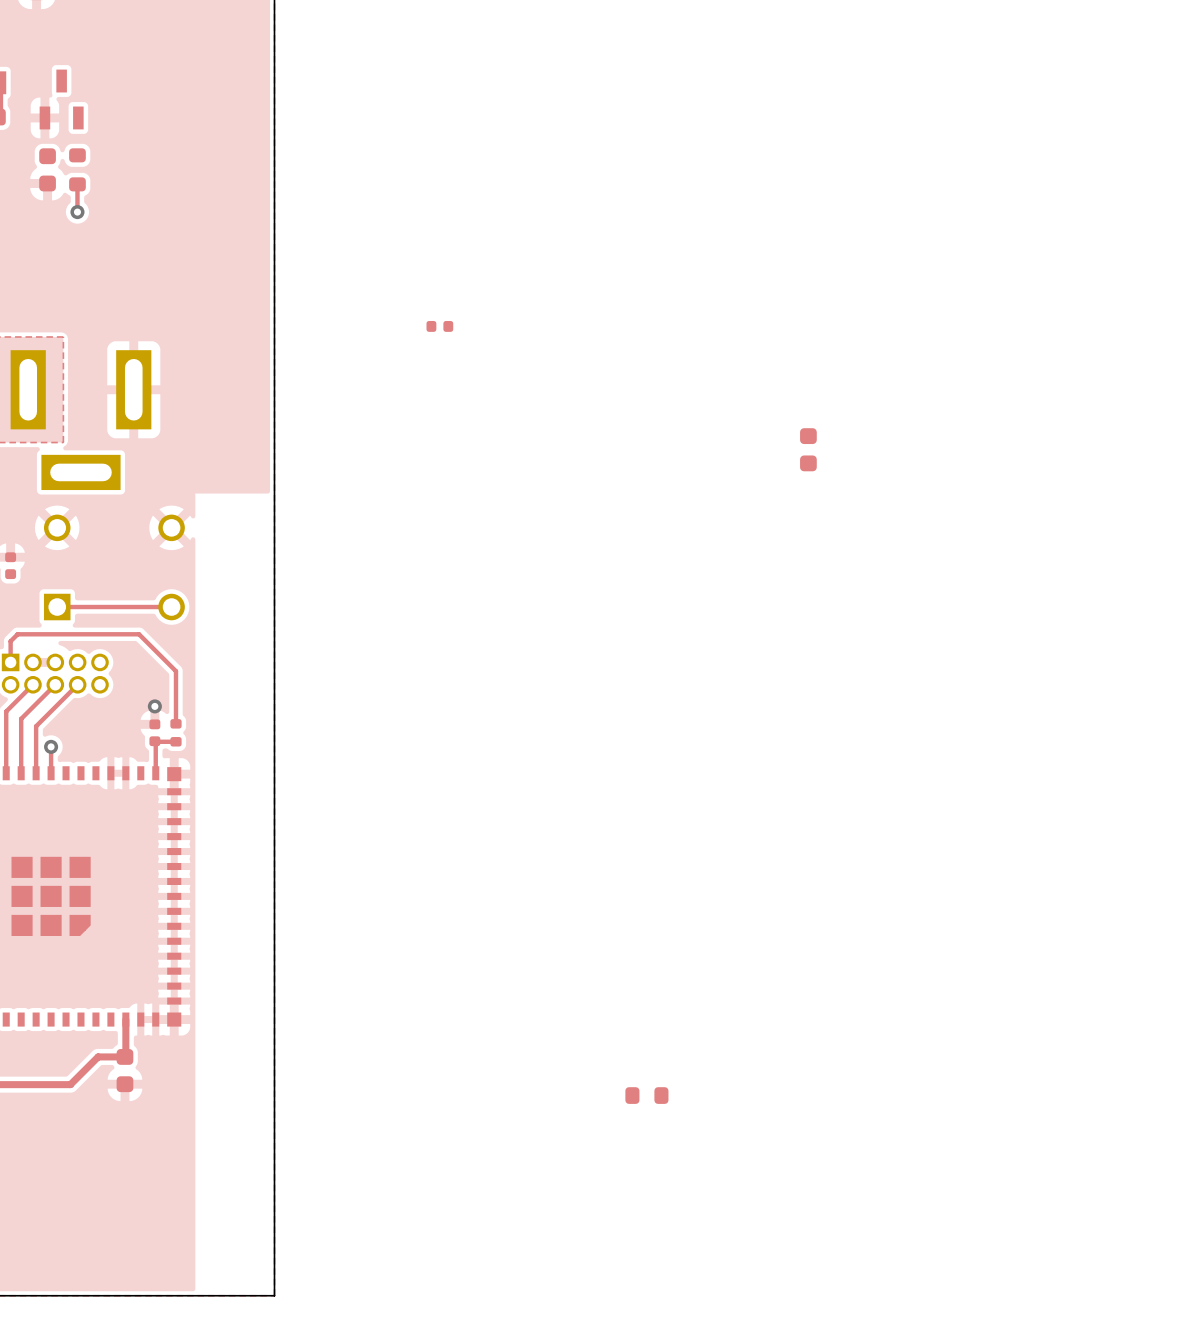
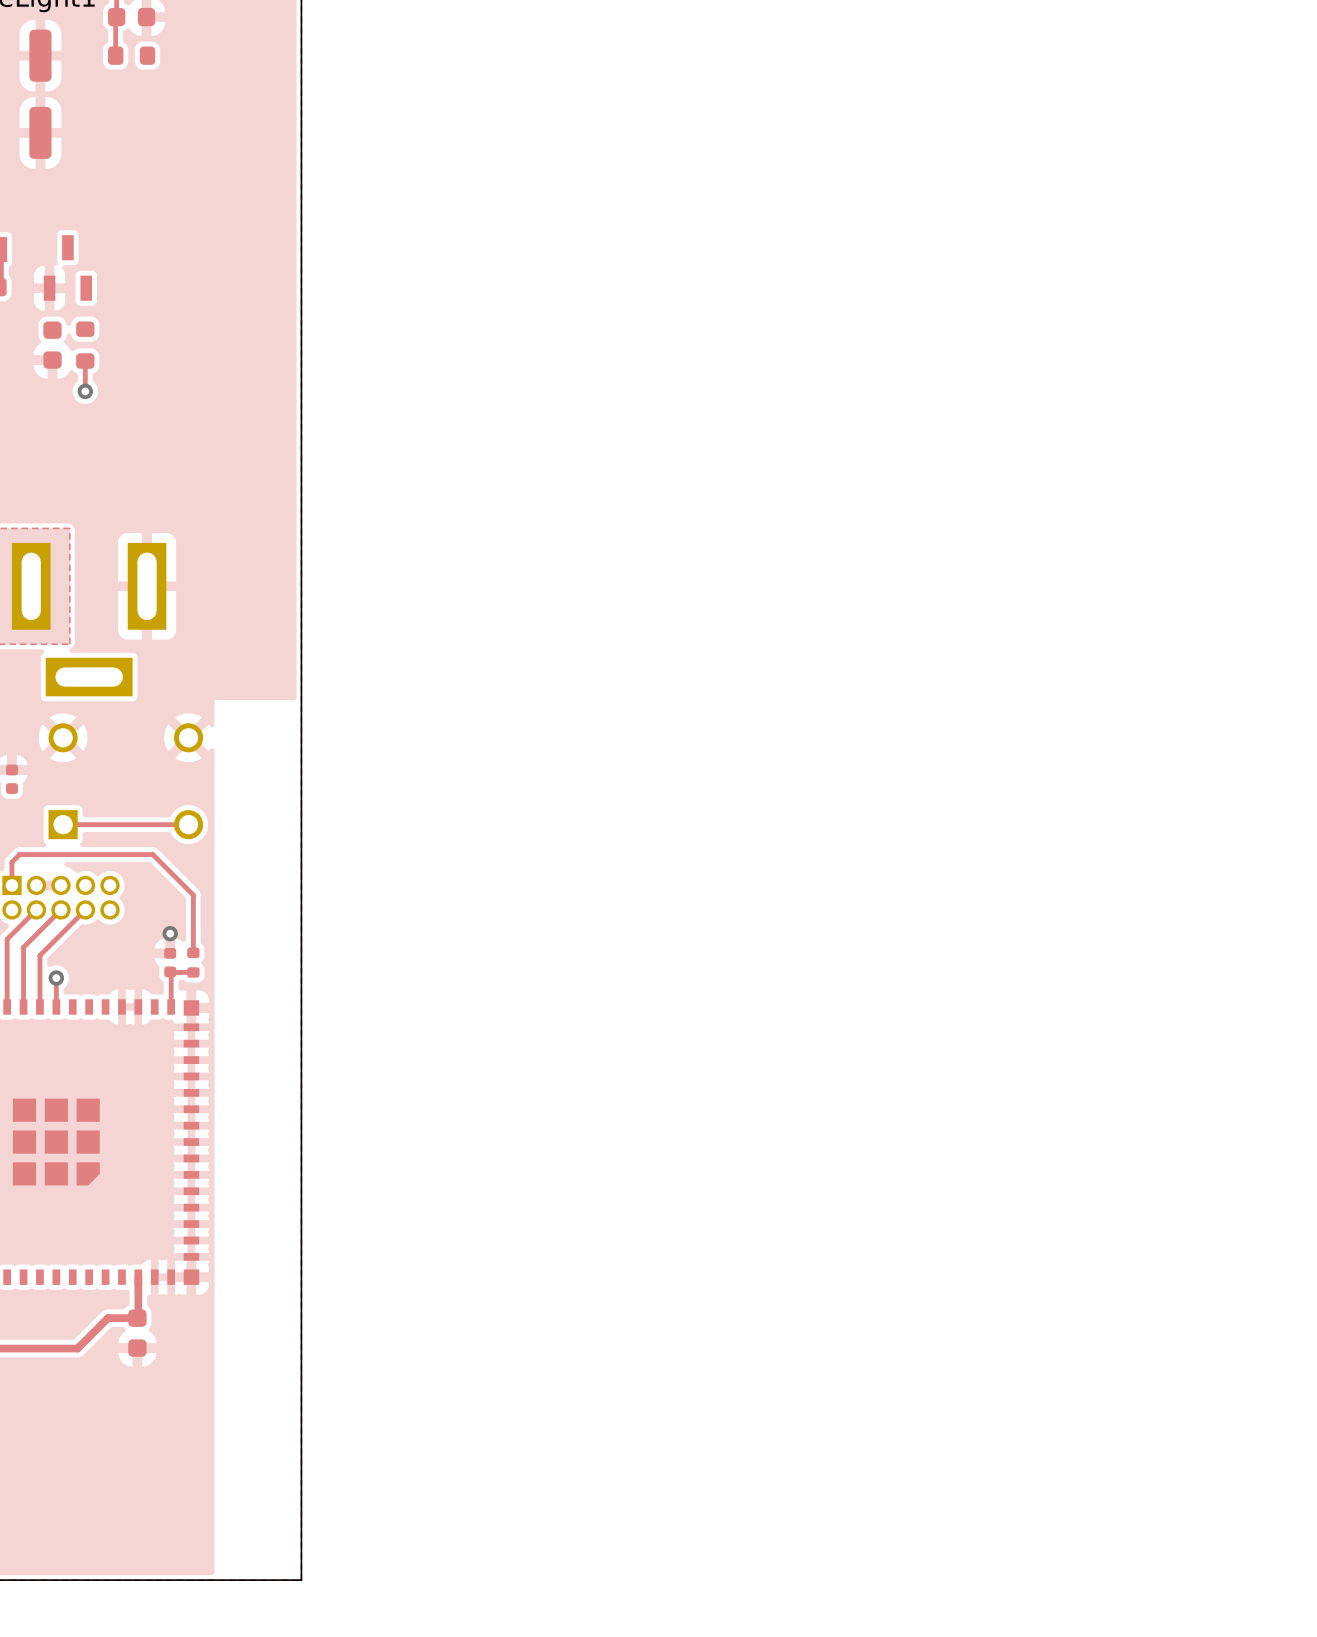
part: (439, 326) -> none
part: (808, 449) -> none
part: (646, 1095) -> none

